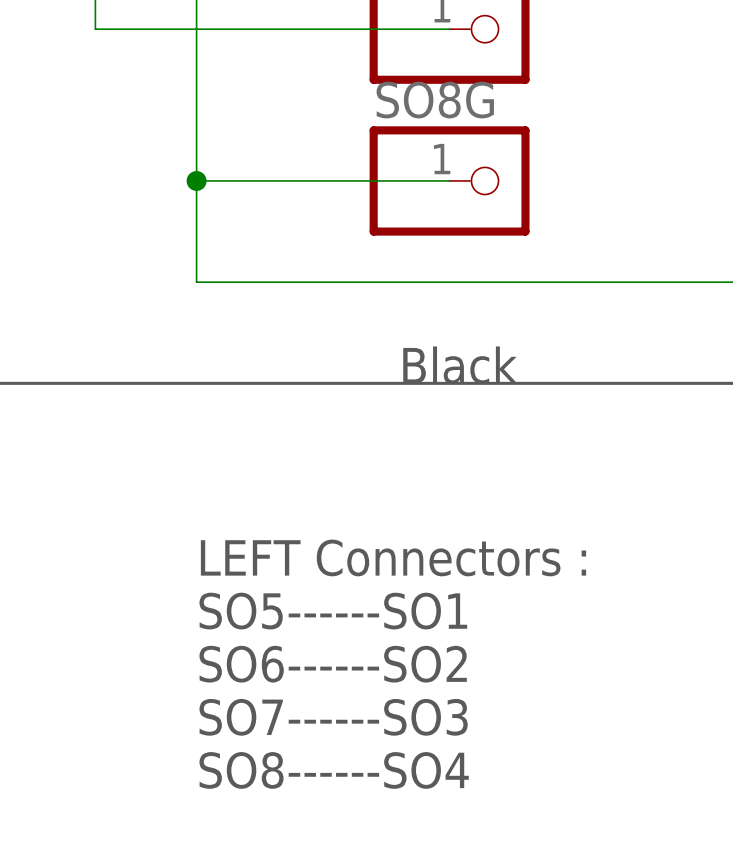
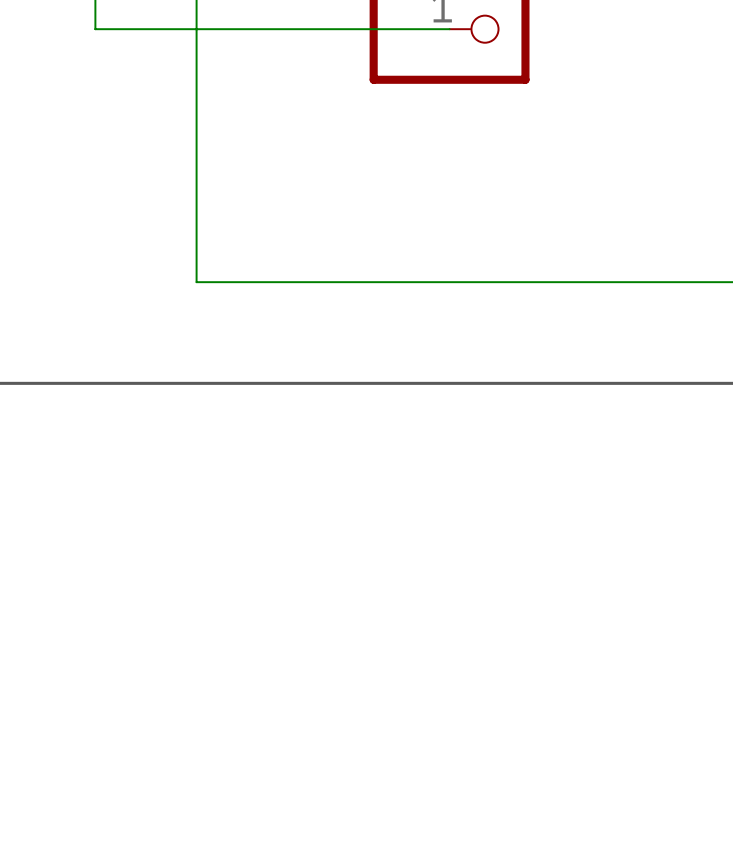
wire: (196, 180) (449, 180) -> none
junction: (196, 180) -> none
SO8G: (449, 180) -> none
text: Black (460, 365) -> none
text: LEFT Connectors : (393, 557) -> none
text: SO5------SO1 (333, 611) -> none
text: SO6------SO2 (333, 664) -> none
text: SO7------SO3 (333, 717) -> none
text: SO8------SO4 (334, 770) -> none

